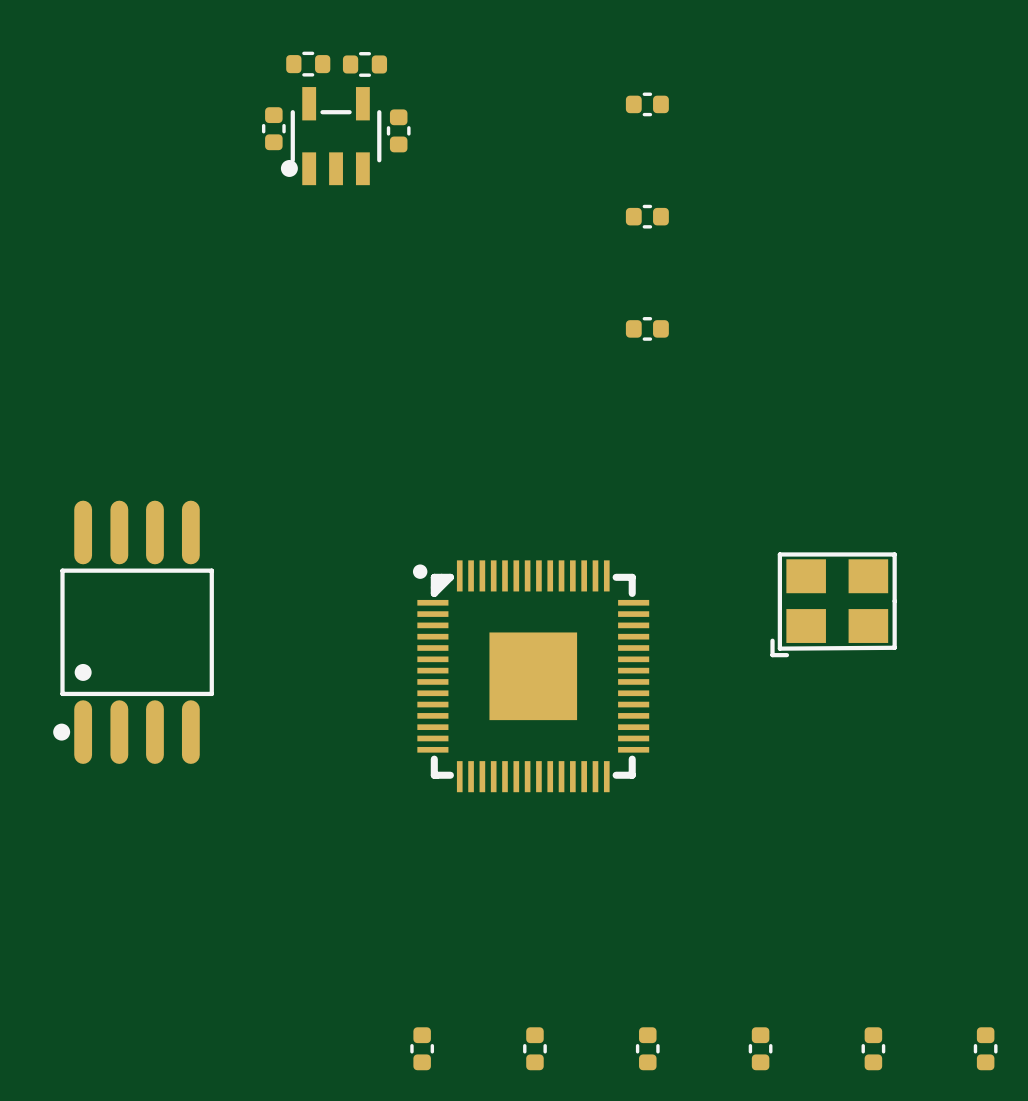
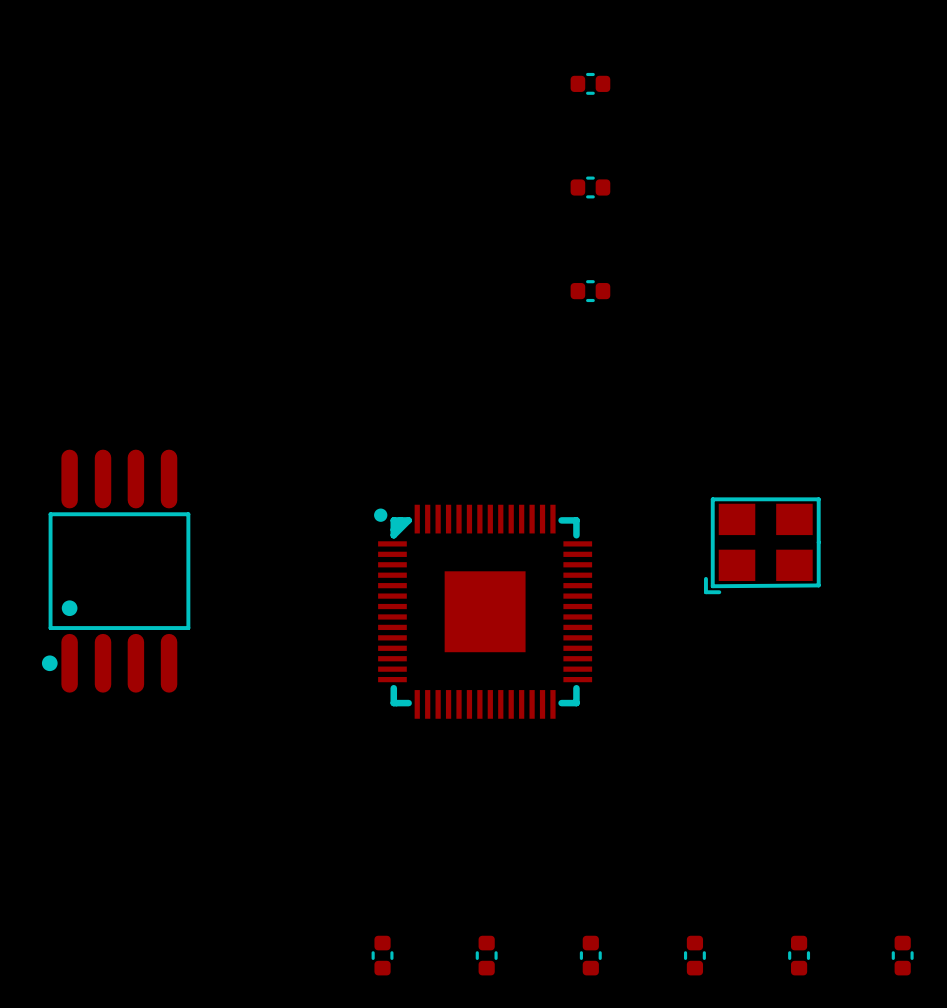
part: (308, 64) -> none
part: (364, 64) -> none
part: (273, 128) -> none
part: (398, 130) -> none
part: (331, 136) -> none

